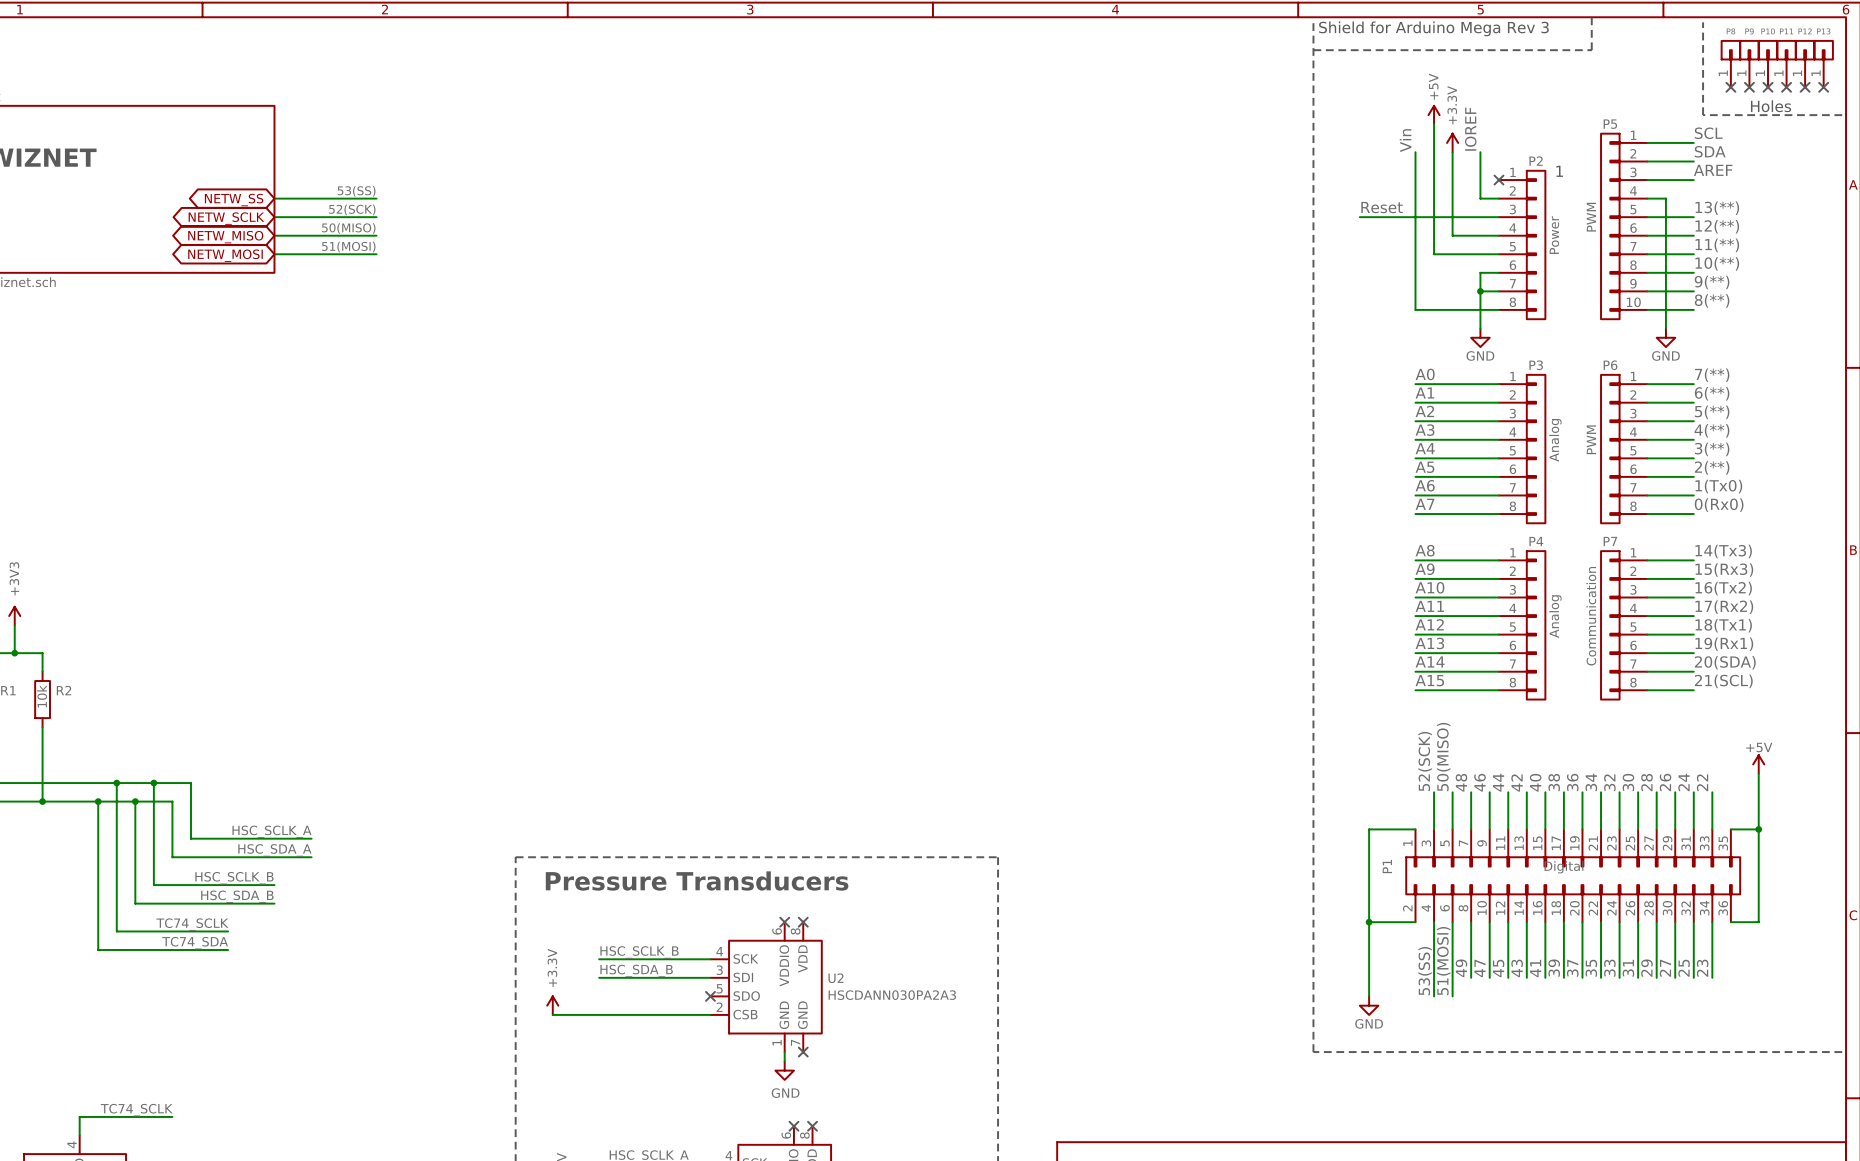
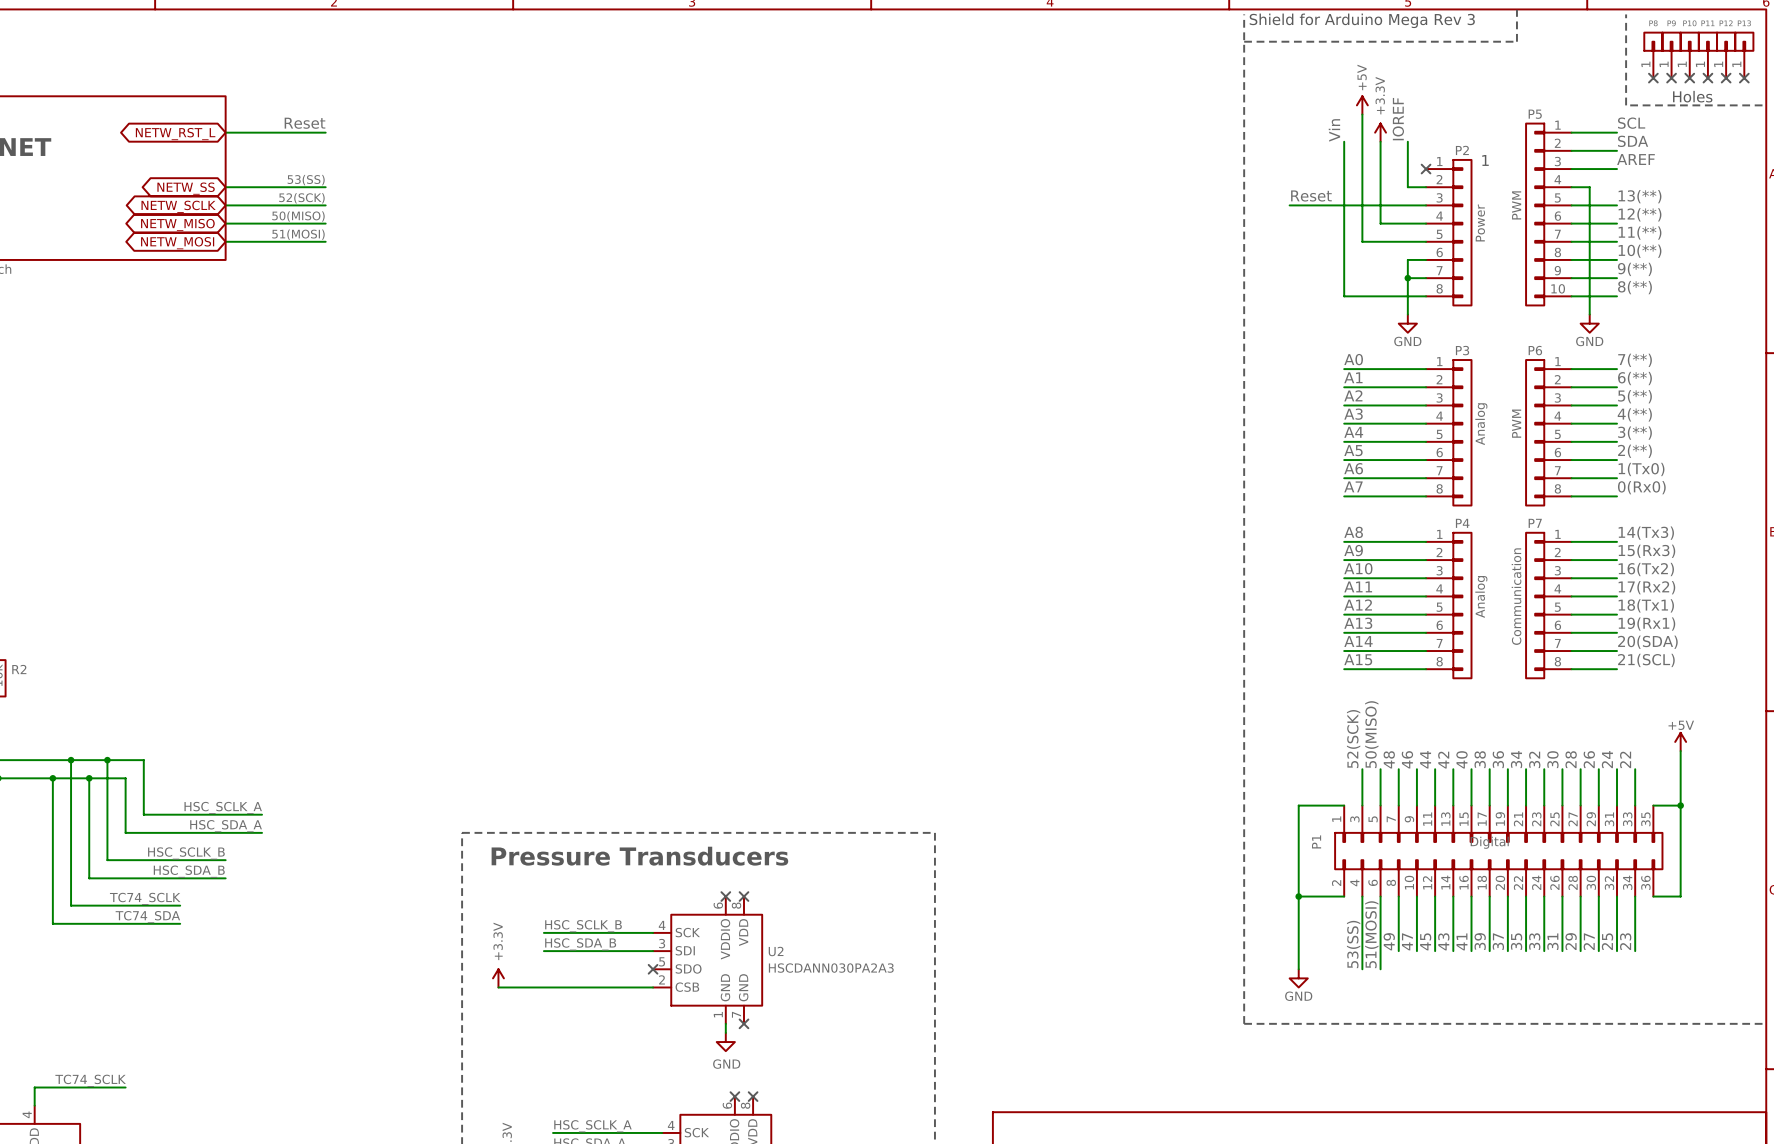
label: none -> Reset (304, 123)
wire: none -> (225, 132) (325, 132)
global label: none -> NETW_RST_L (175, 134)

